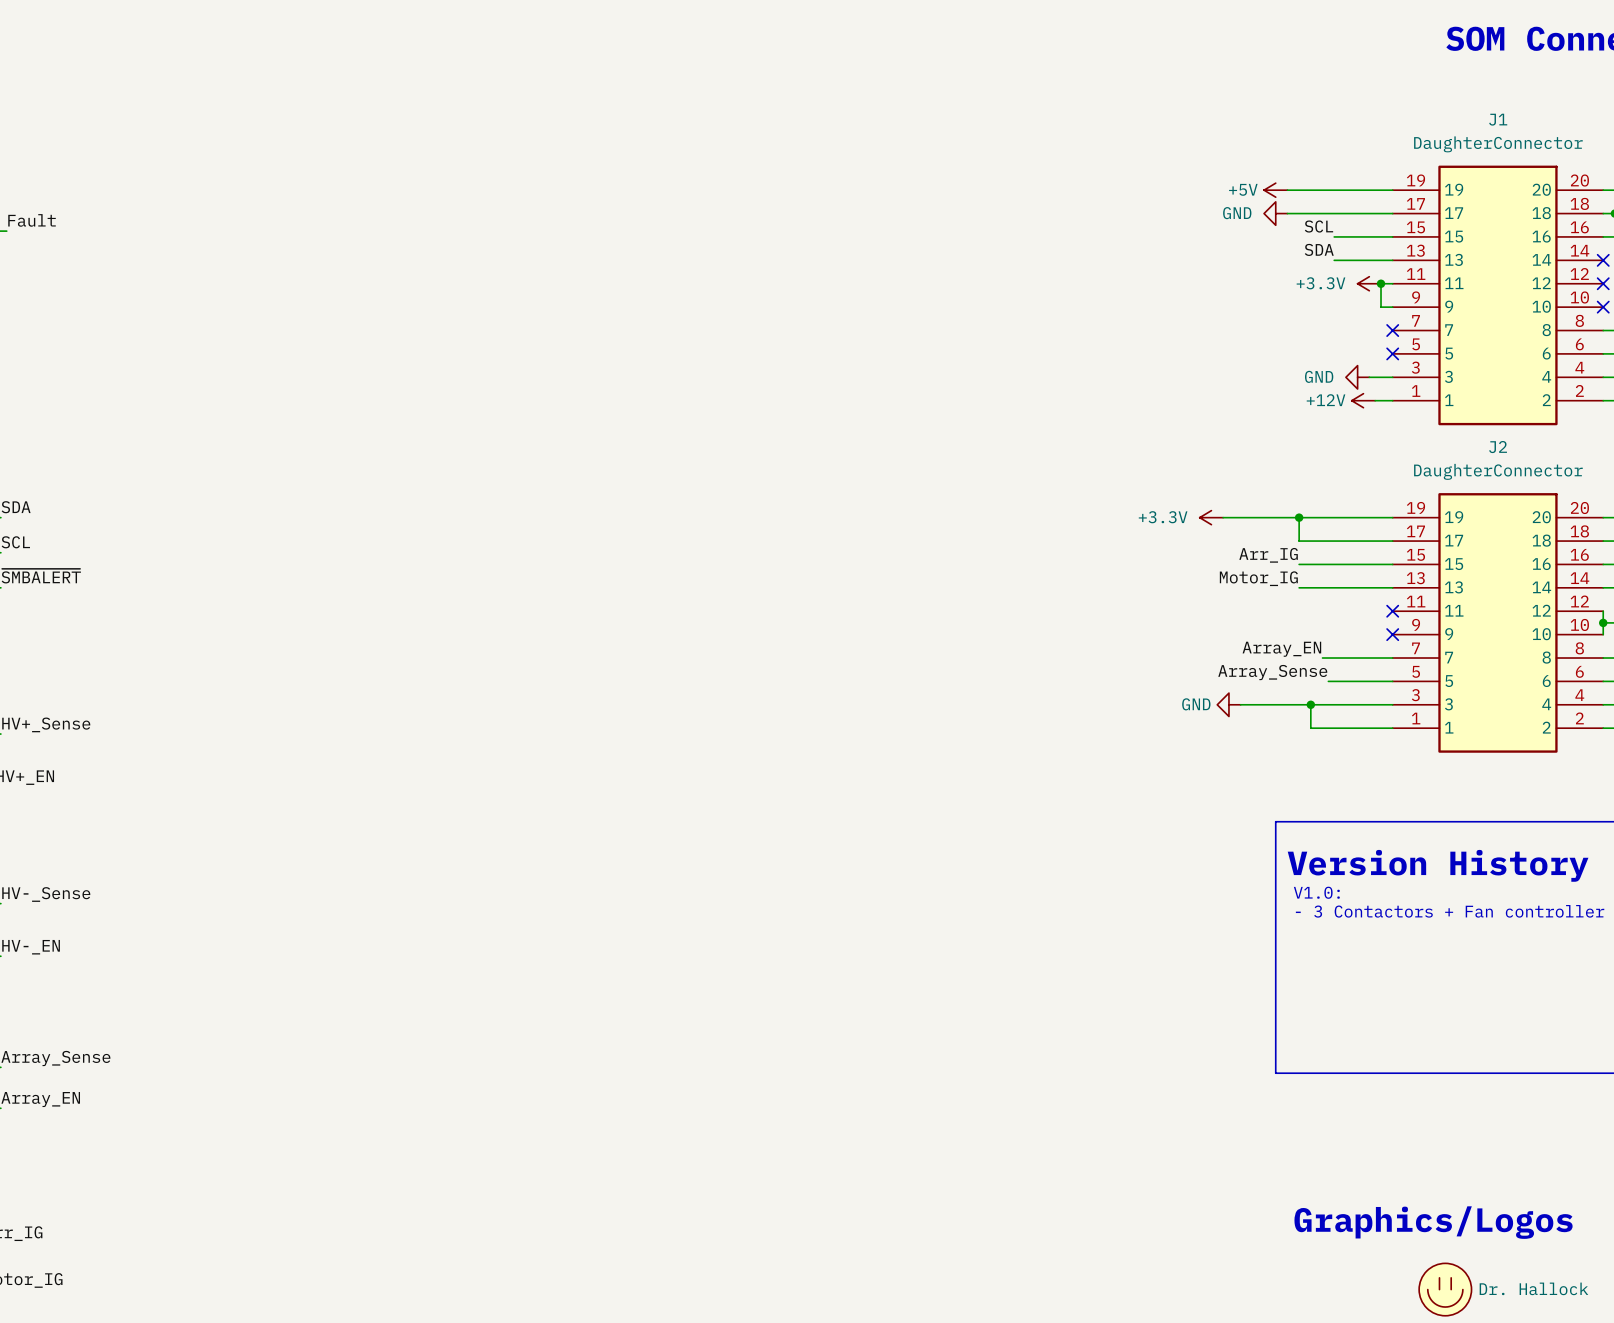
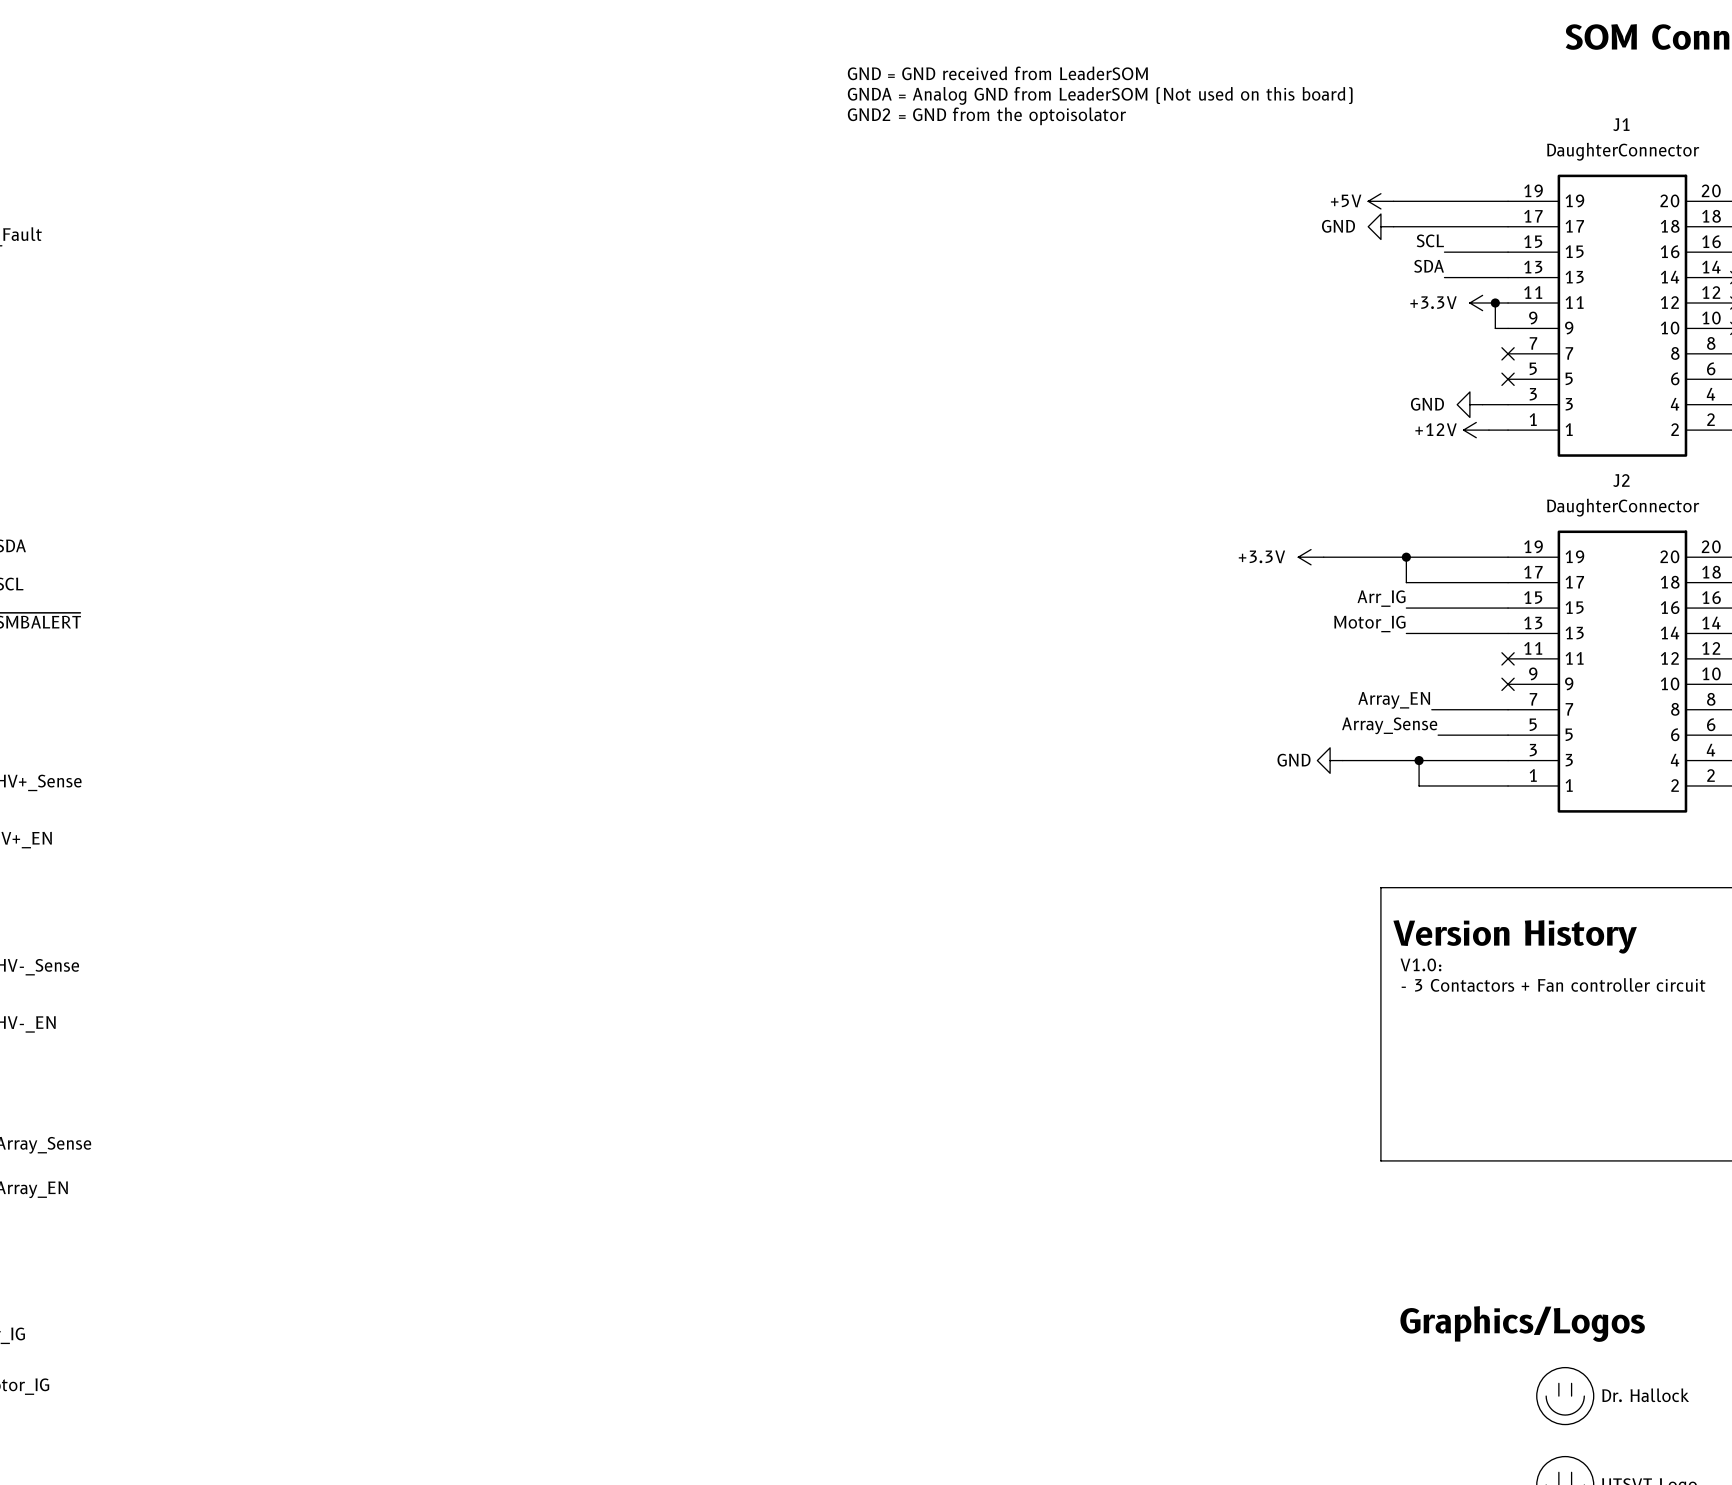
text: none -> GND = GND received from LeaderSOM (997, 73)
text: none -> GNDA = Analog GND from LeaderSOM (Not used on this board) (1100, 95)
text: none -> GND2 = GND from the optoisolator (986, 116)

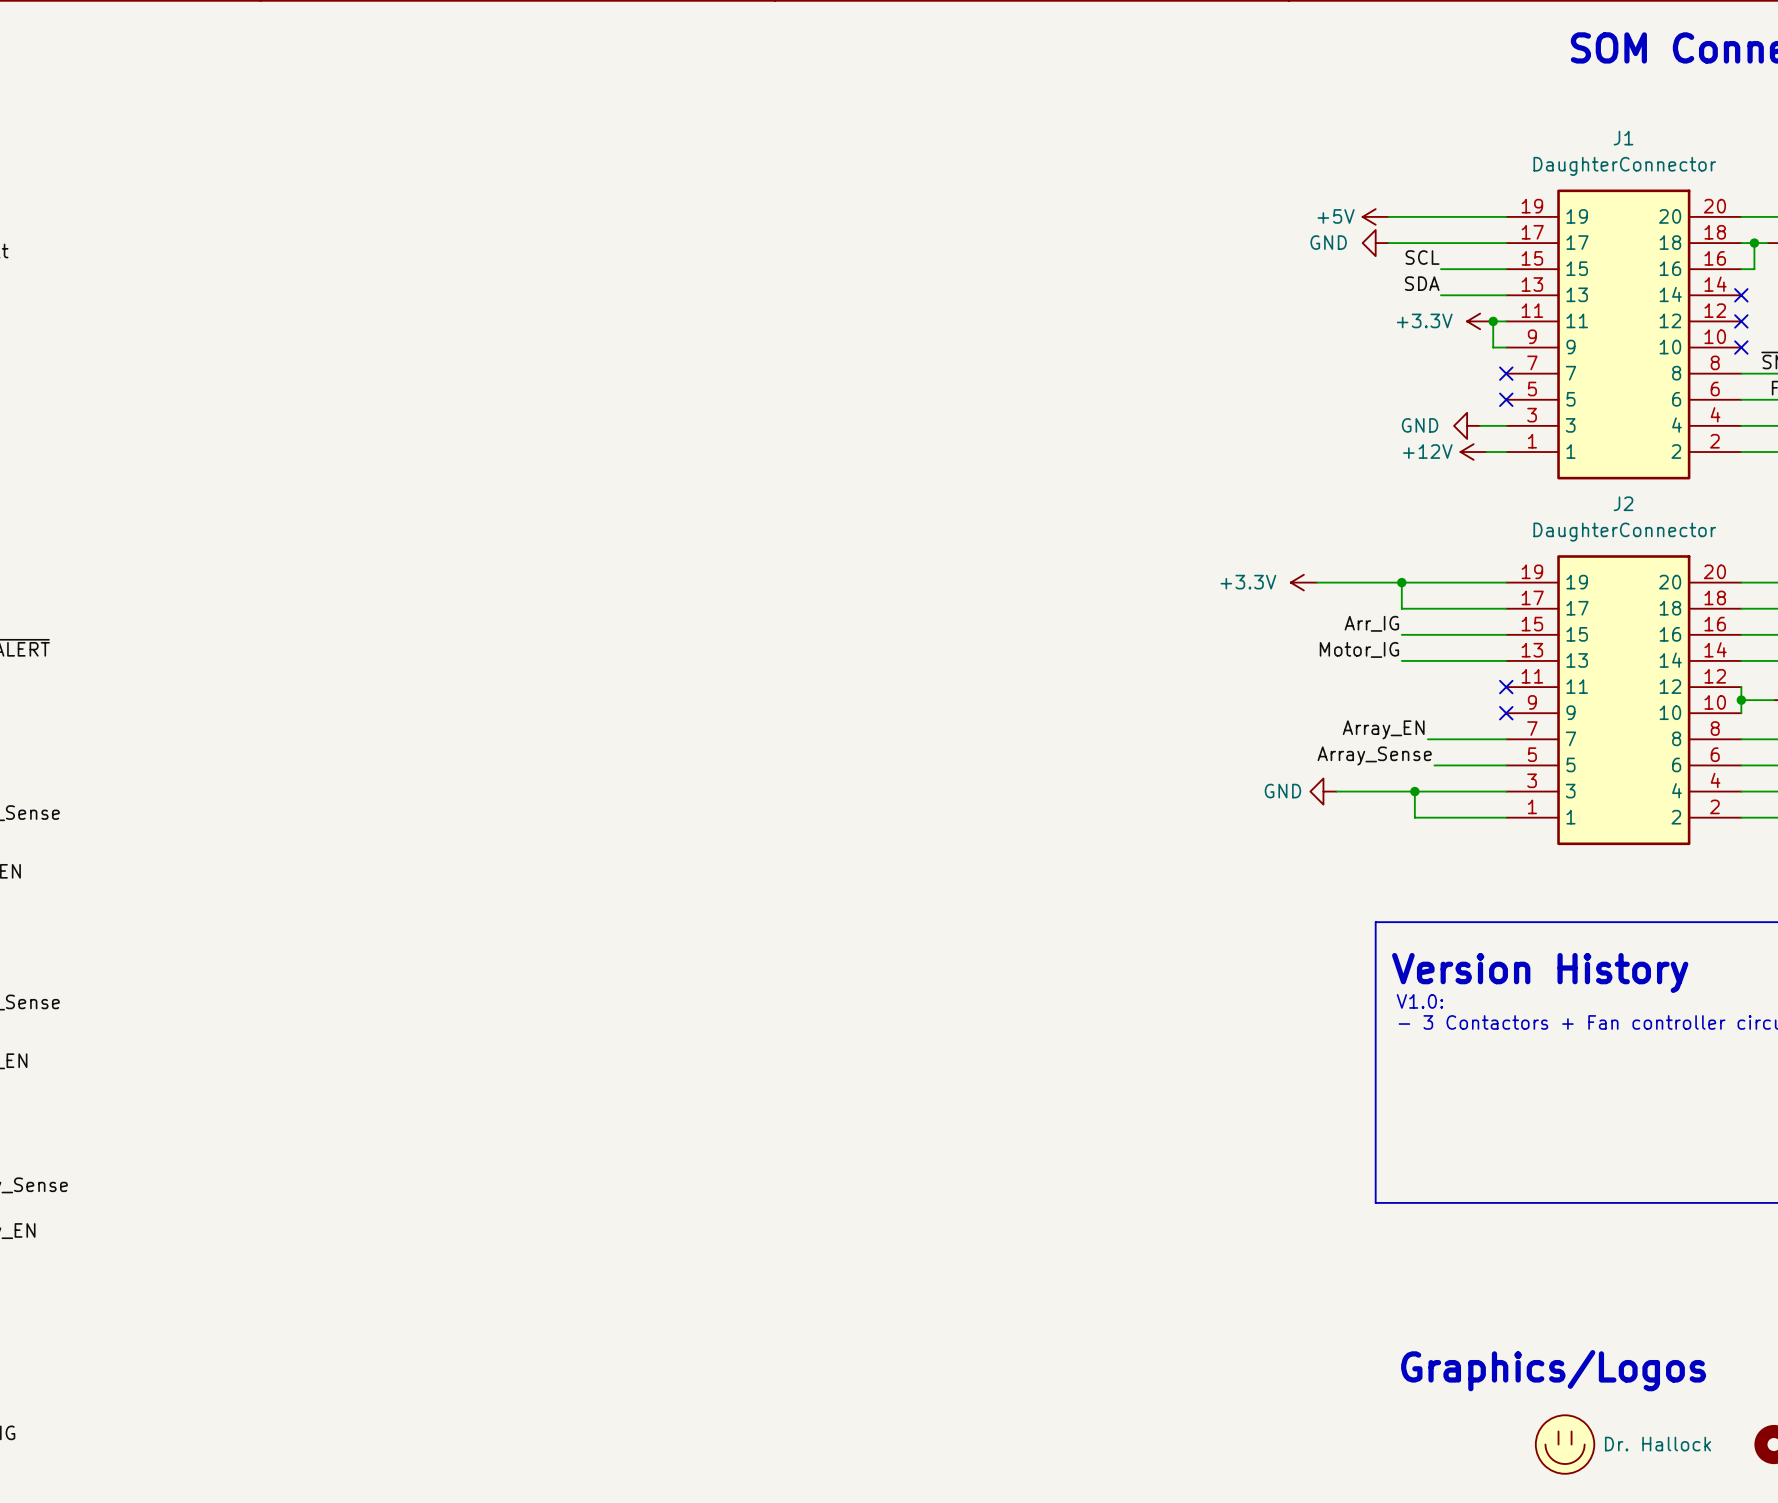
text: GND = GND received from LeaderSOM (997, 73) -> none
text: GNDA = Analog GND from LeaderSOM (Not used on this board) (1100, 95) -> none
text: GND2 = GND from the optoisolator (986, 116) -> none

